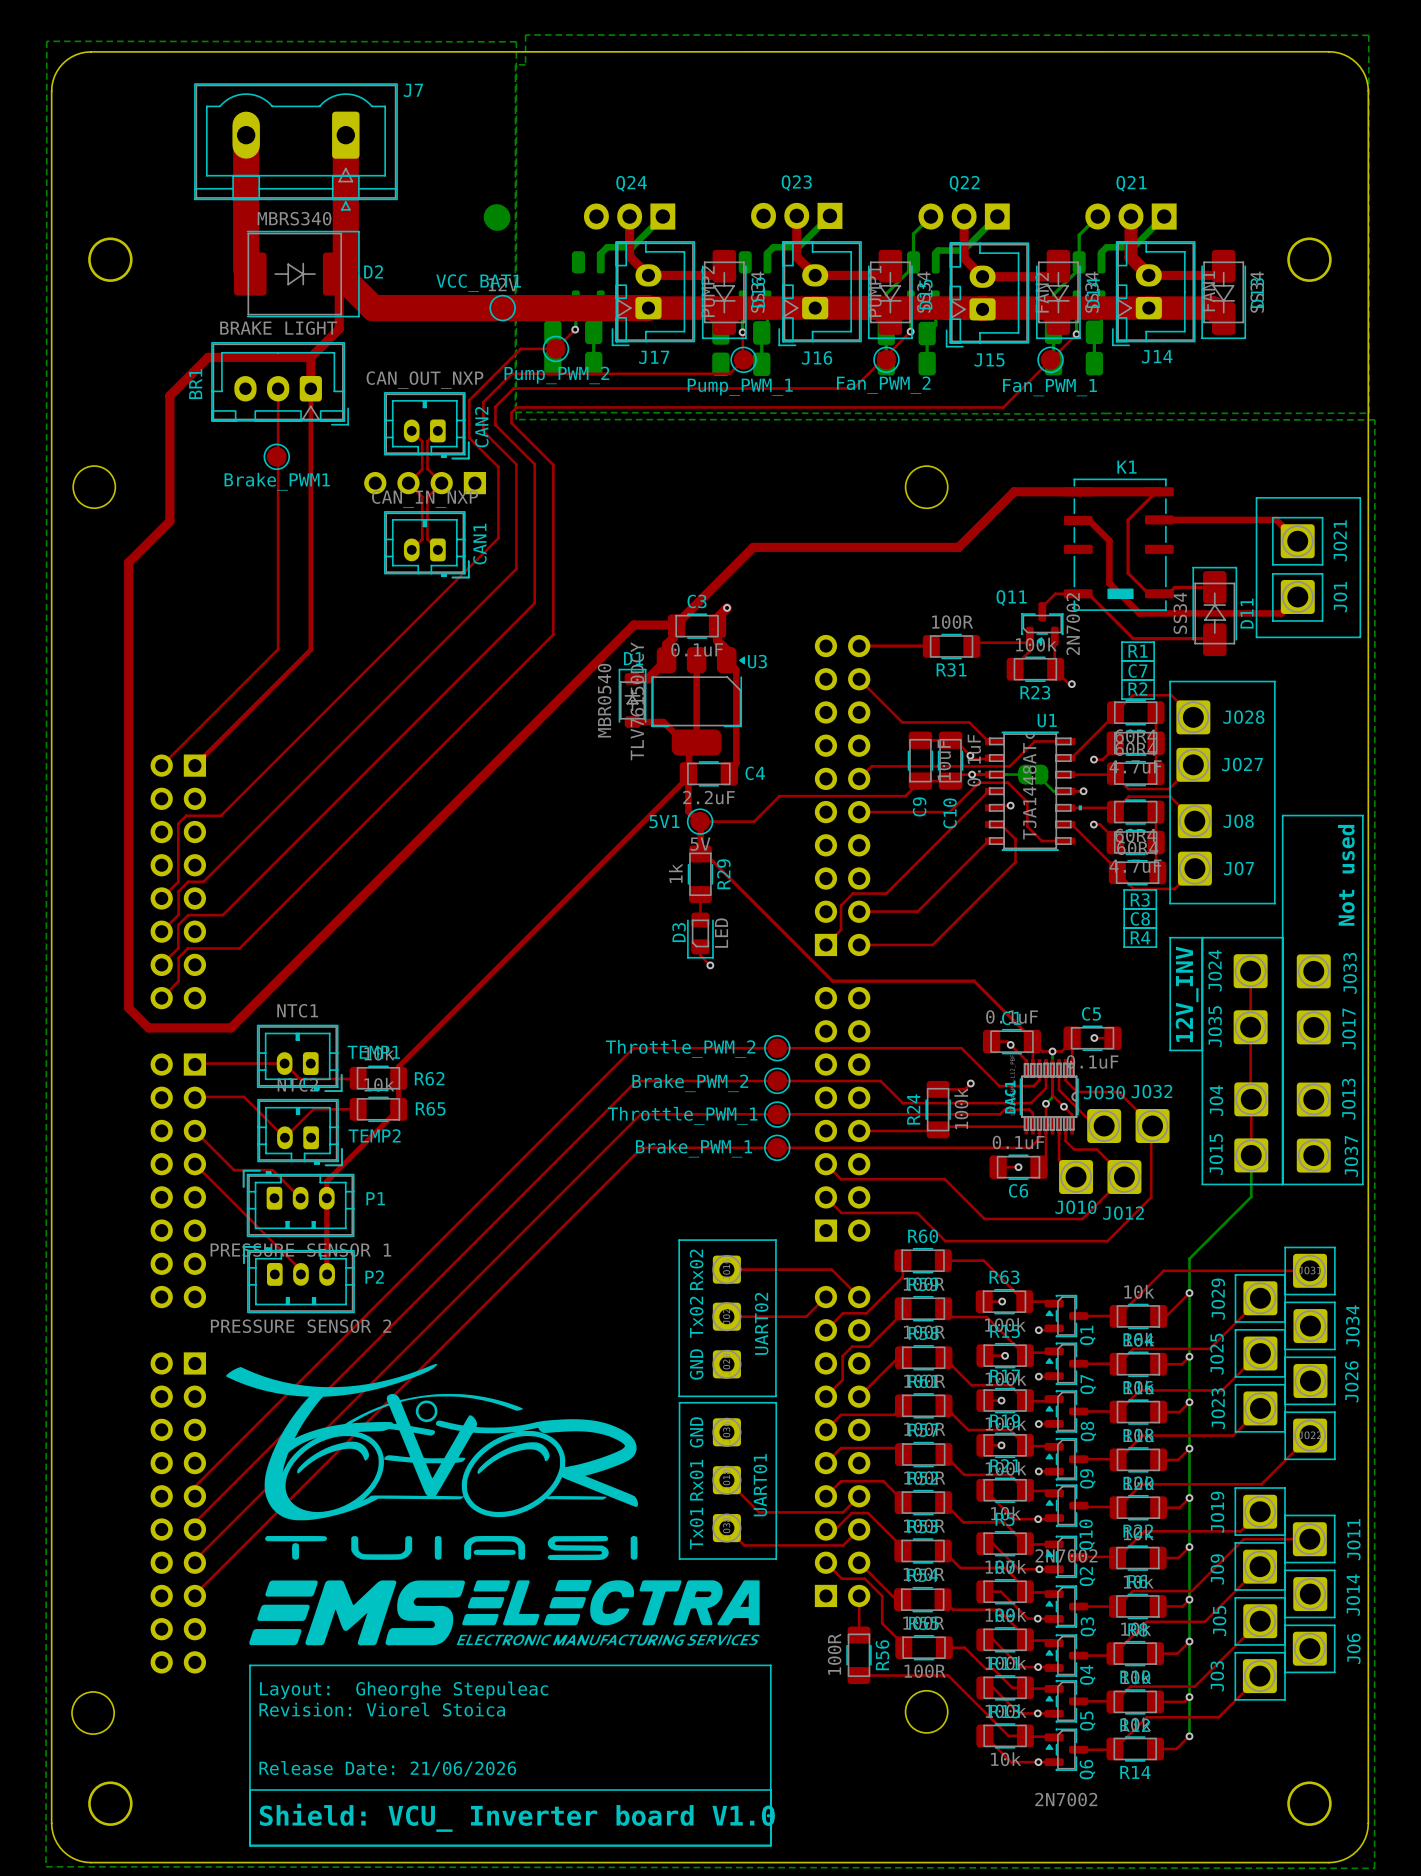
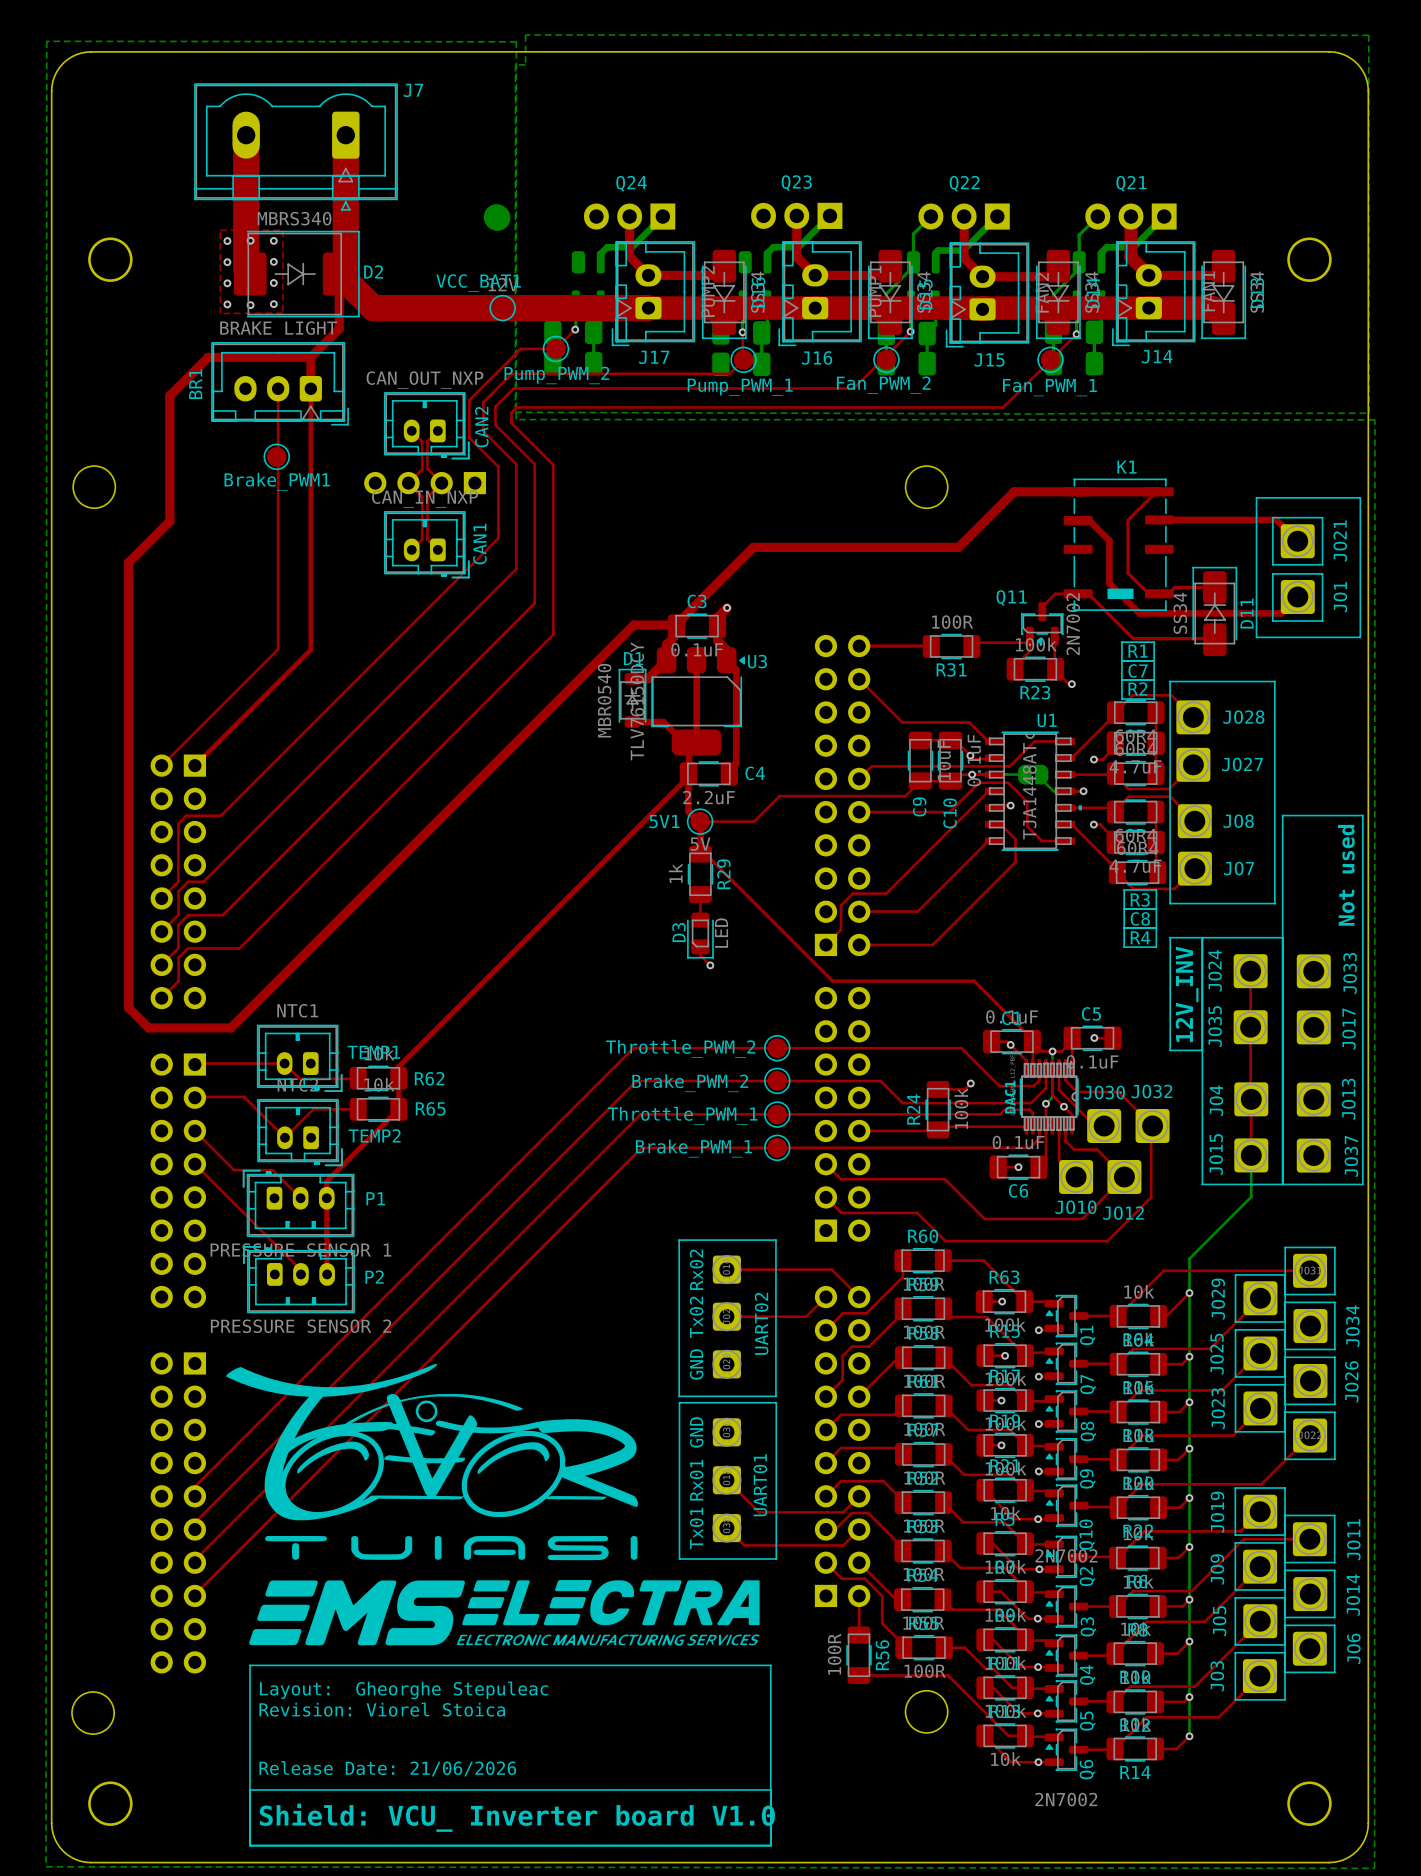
top zone outline: none -> (220, 230) (282, 230) (282, 313) (220, 313) (220, 230)
via: none -> (250, 240)
via: none -> (273, 240)
via: none -> (227, 241)
via: none -> (273, 261)
via: none -> (227, 262)
via: none -> (227, 283)
via: none -> (273, 283)
via: none -> (227, 304)
via: none -> (273, 304)
via: none -> (250, 305)

